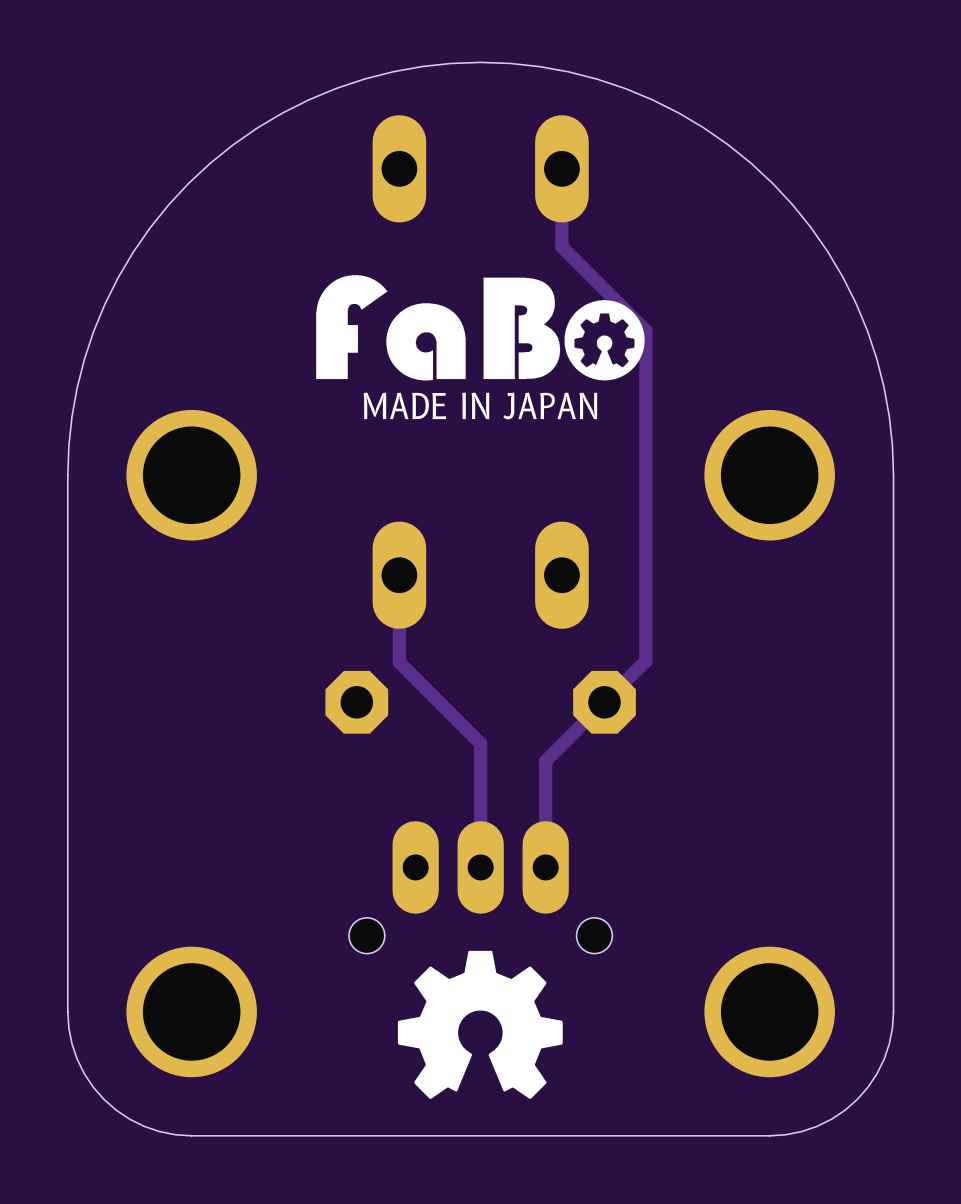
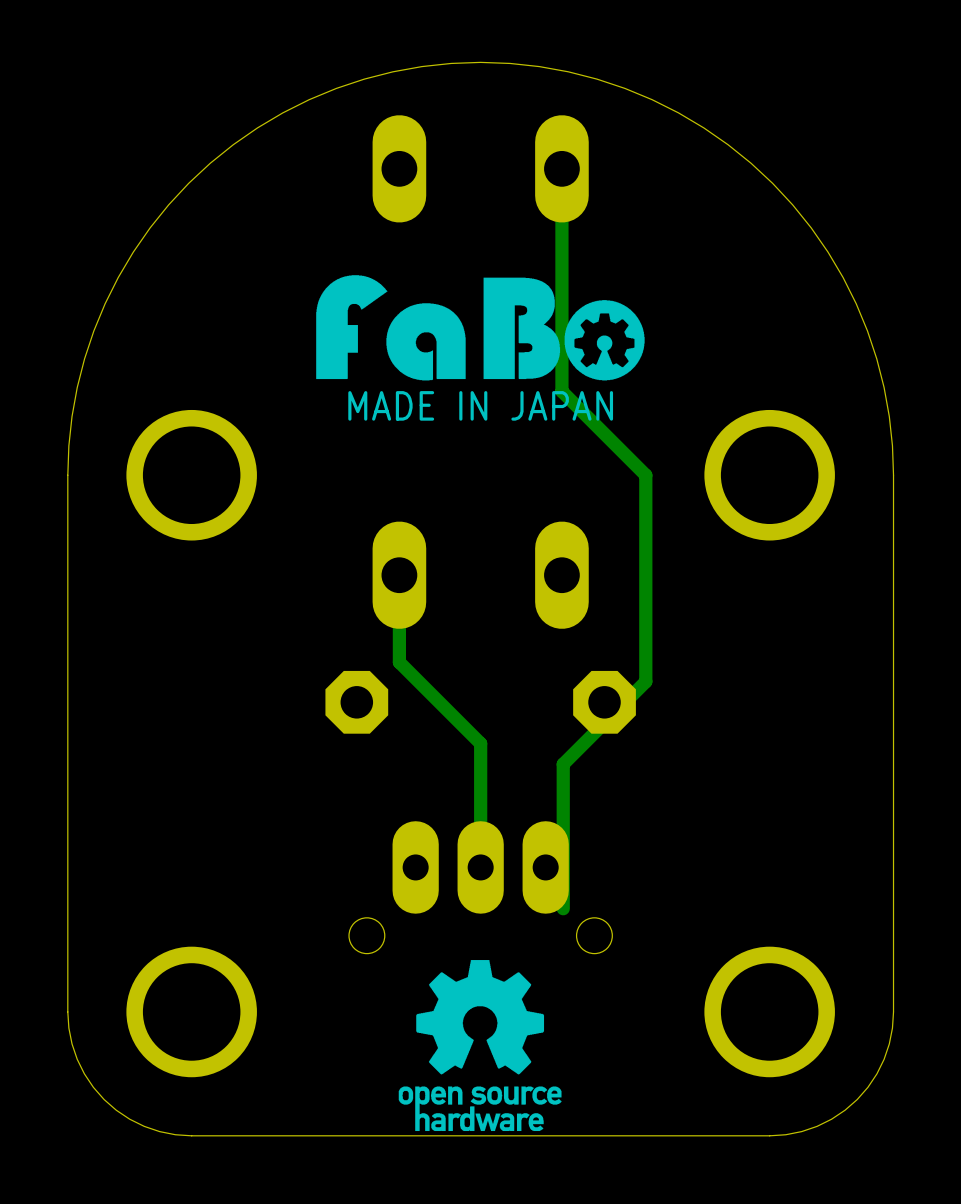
track: (561, 246) (645, 330) (645, 475) -> (561, 246) (561, 391) (645, 475)
track: (645, 661) (545, 761) (545, 867) -> (645, 661) (645, 681) (563, 764) (563, 908)
drawing shape: [397, 950, 563, 1099] -> [398, 960, 562, 1132]

